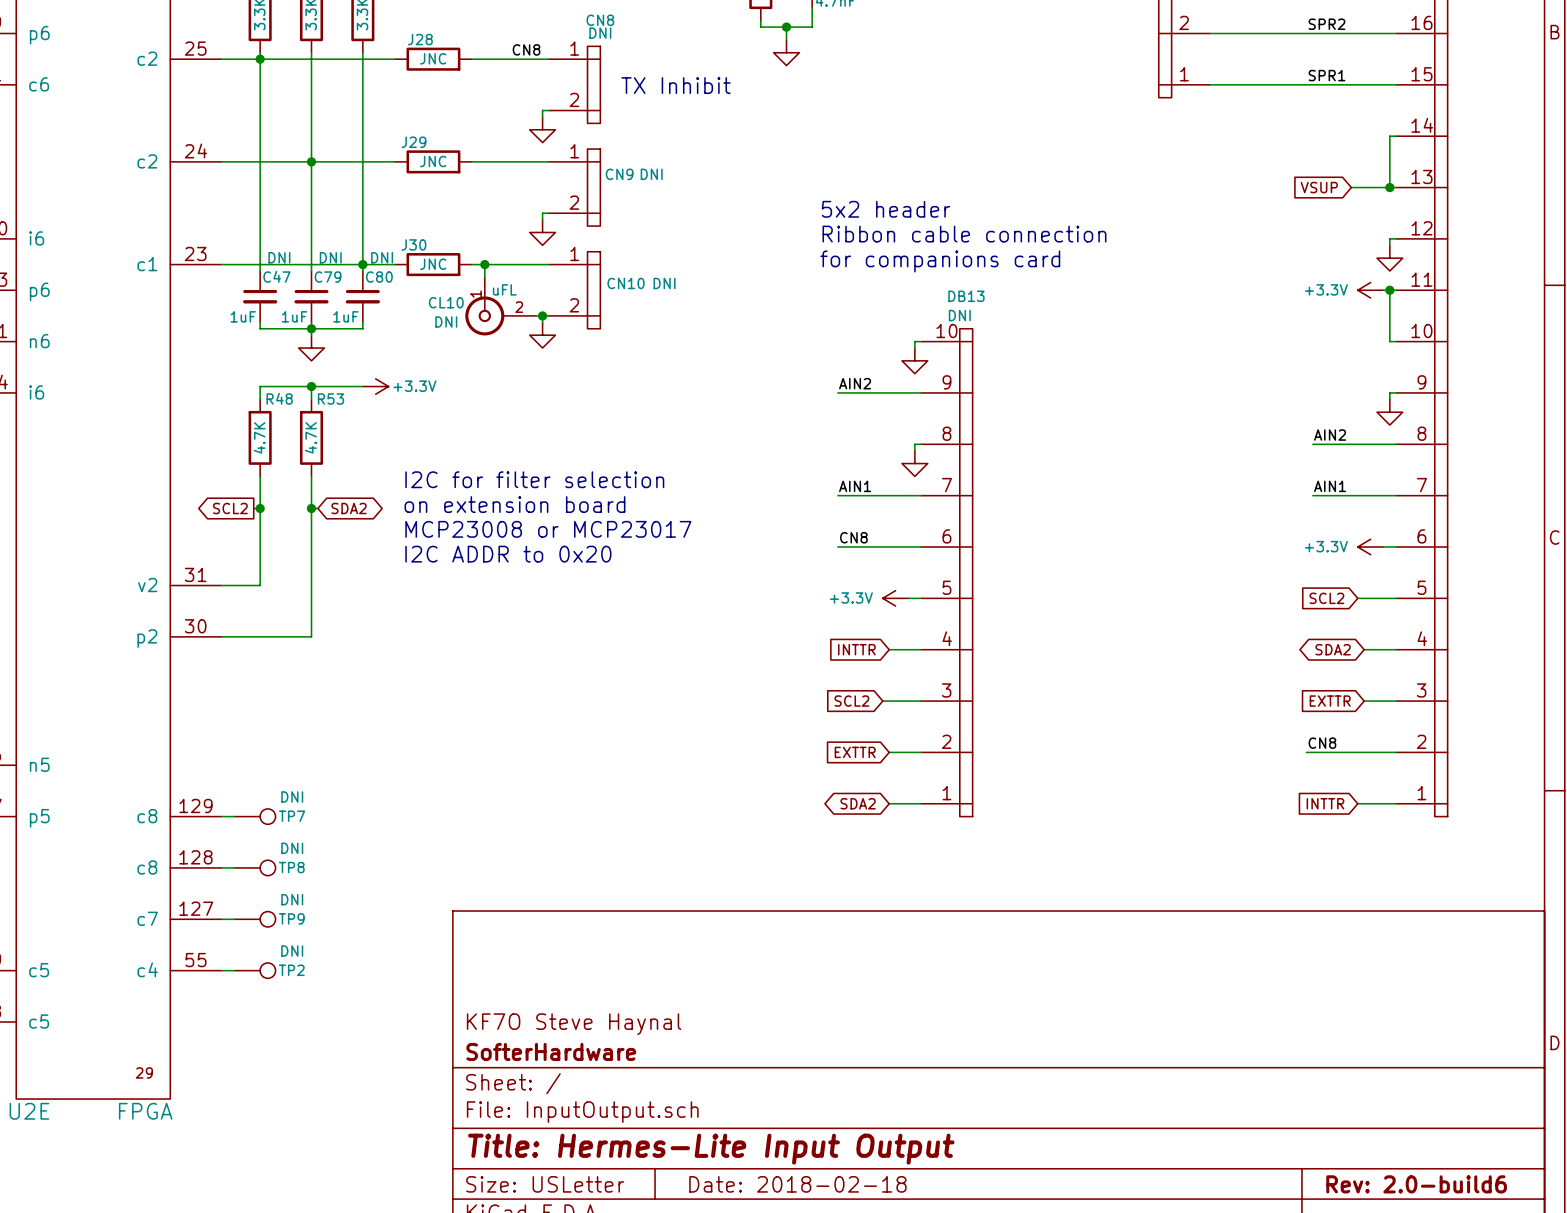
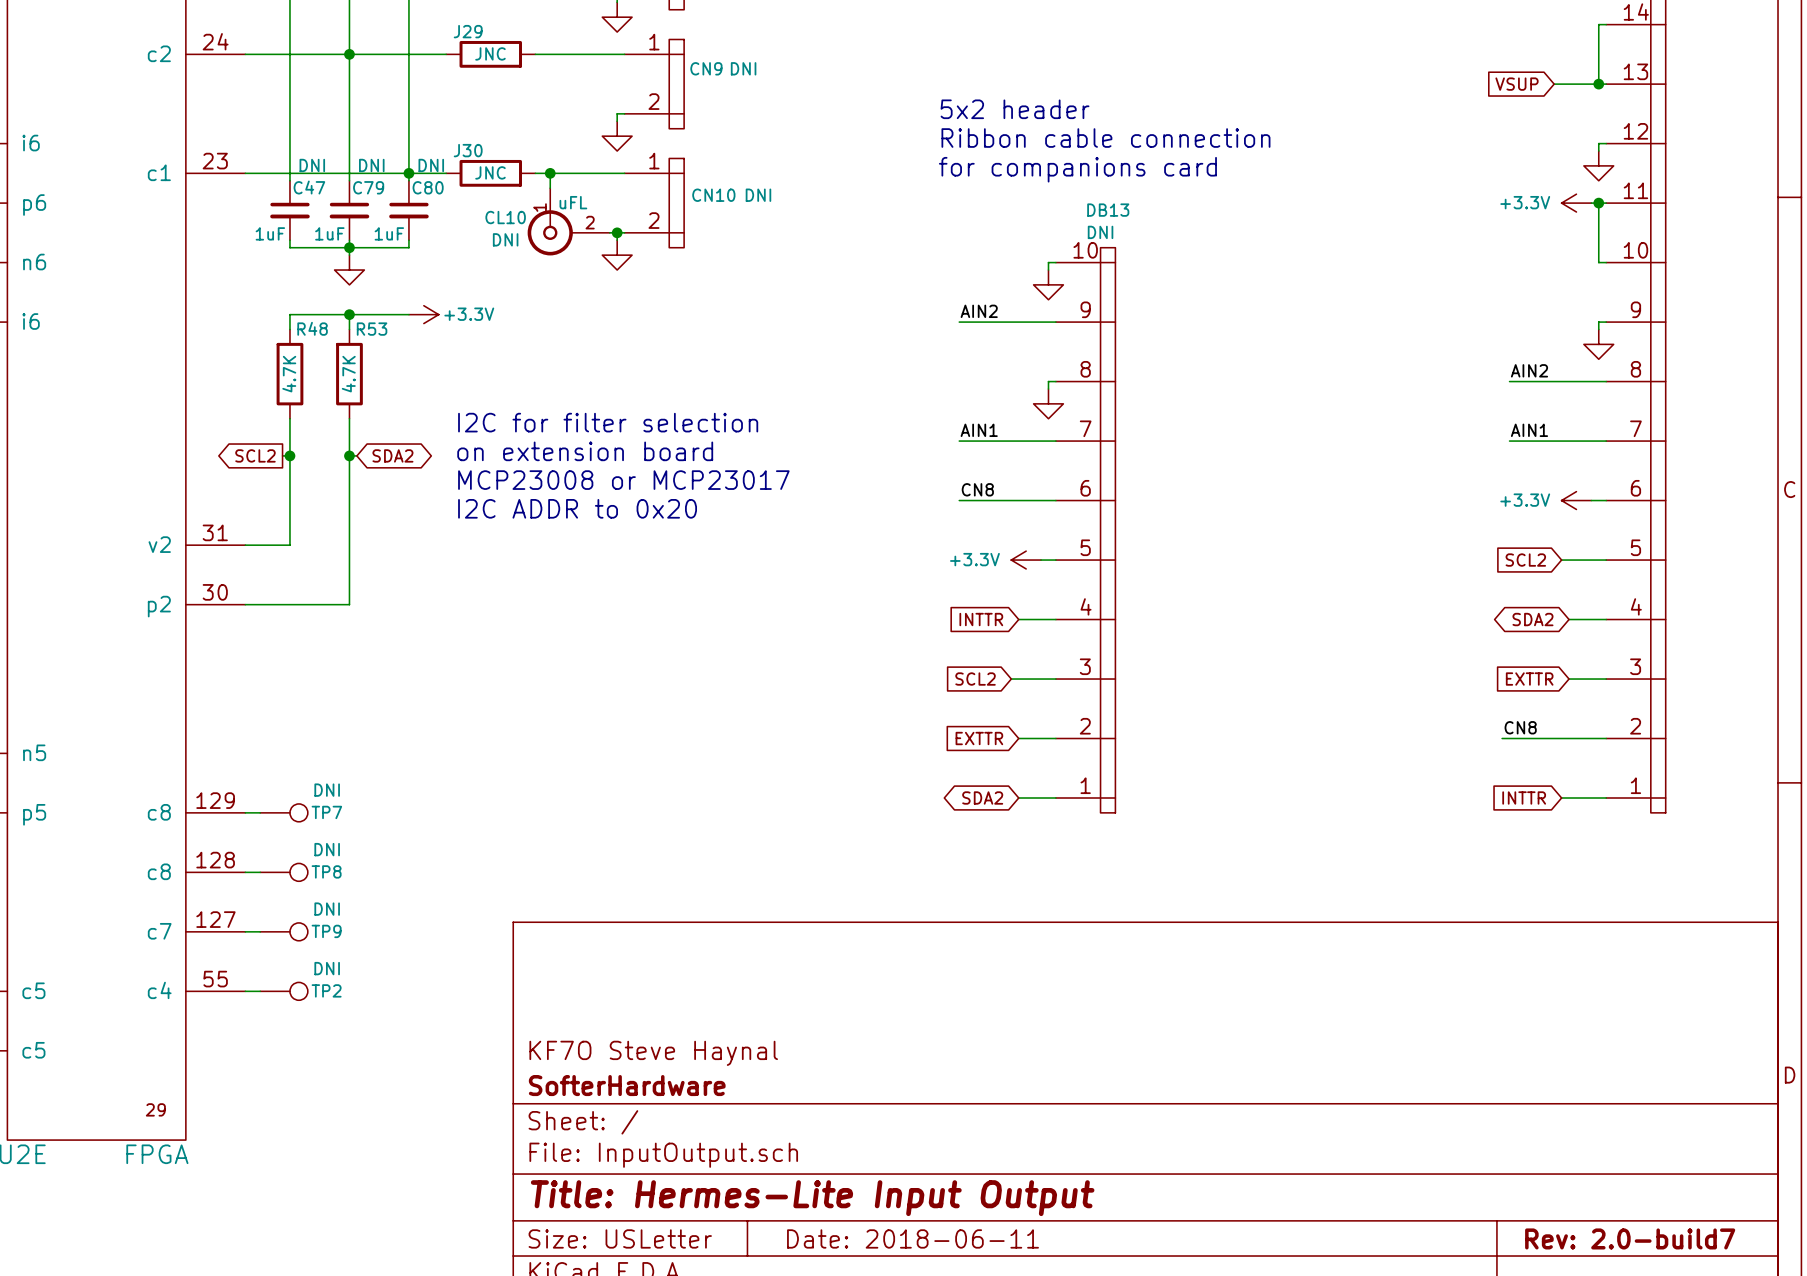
title block: Date: 2018-02-18 (797, 1184) -> Date: 2018-06-11 (913, 1238)
title block: Rev: 2.0-build6 (1416, 1184) -> Rev: 2.0-build7 (1630, 1238)

